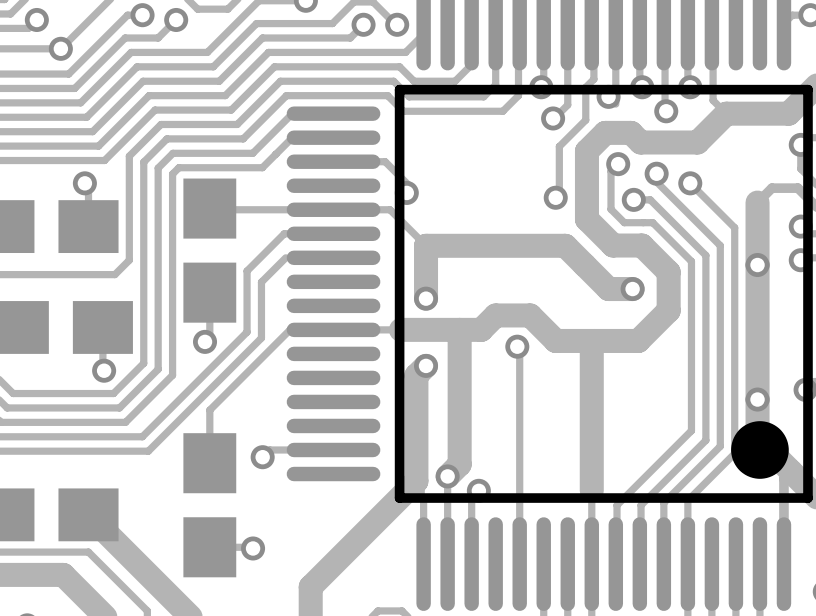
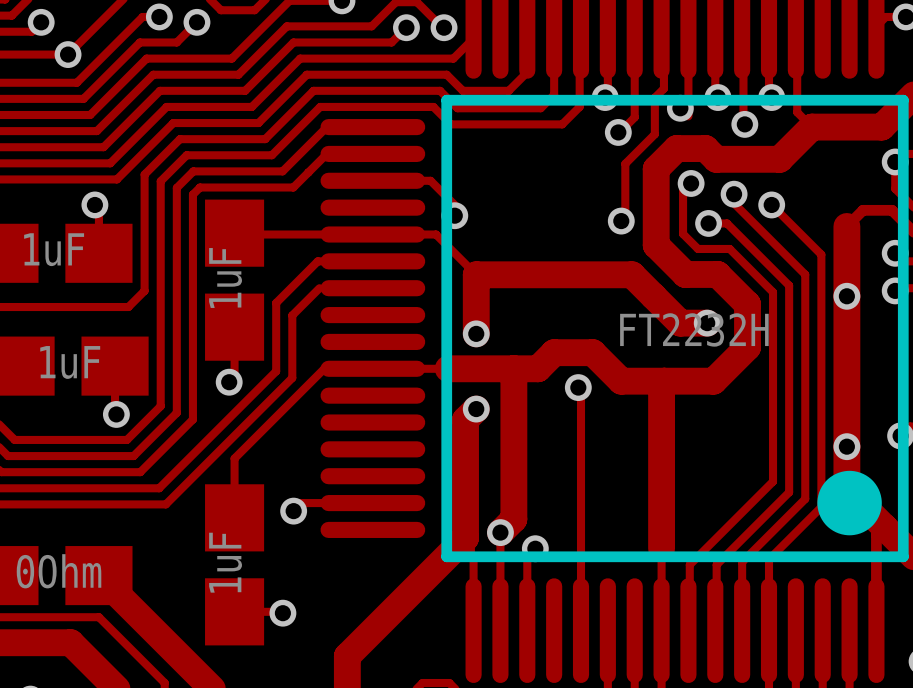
part value: none -> 1uF (54, 249)
part value: none -> 1uF (225, 277)
part value: none -> FT2232H (694, 329)
part value: none -> 1uF (70, 362)
part value: none -> 1uF (225, 562)
part value: none -> 0Ohm (59, 571)

